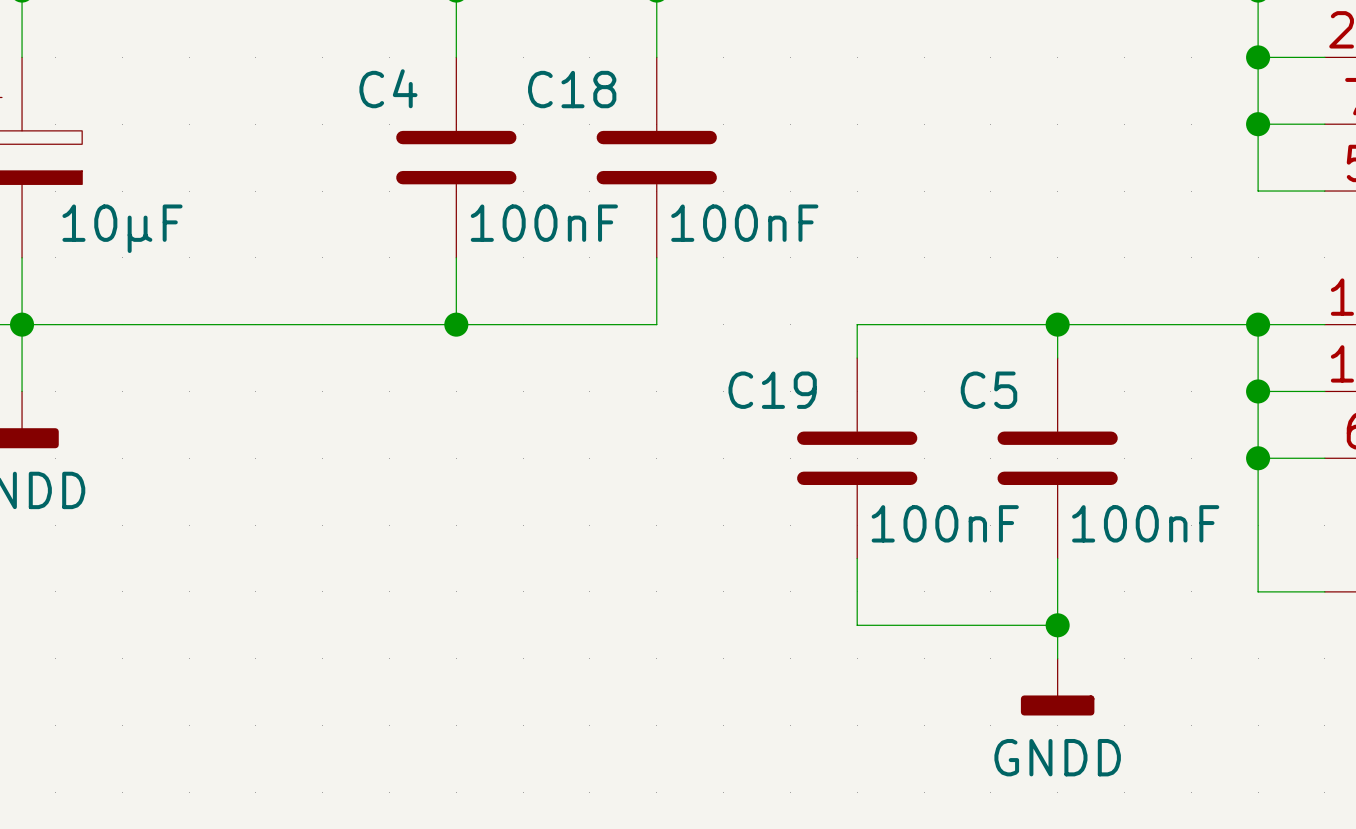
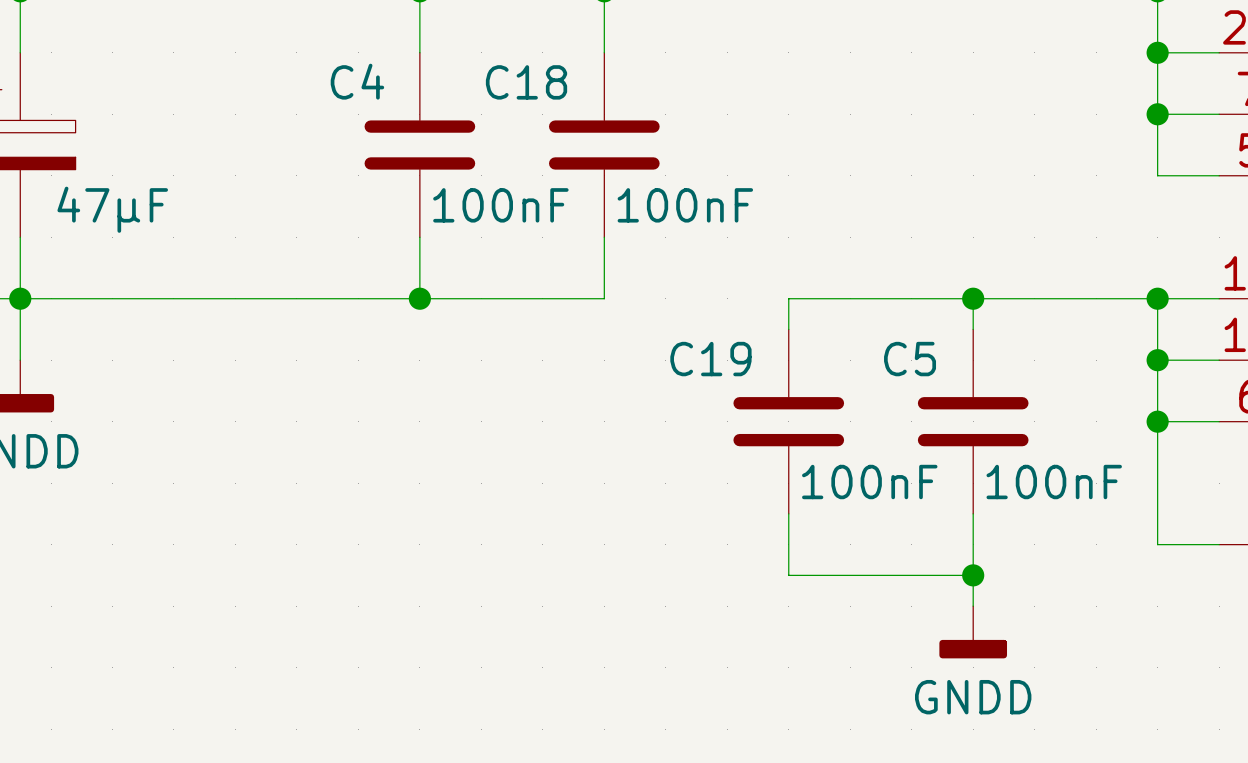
part value: 10µF (122, 228) -> 47µF (112, 209)

